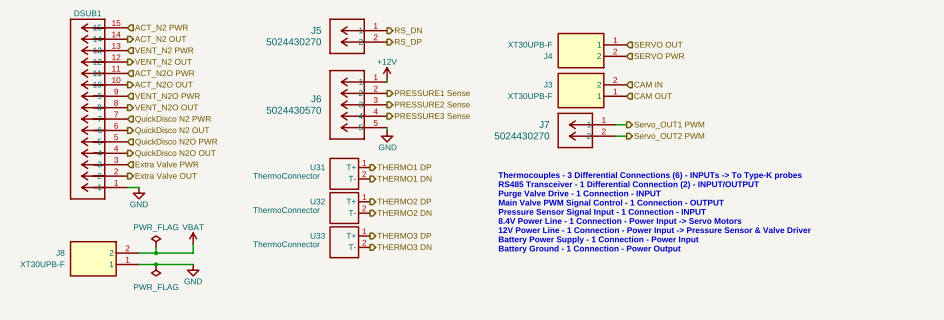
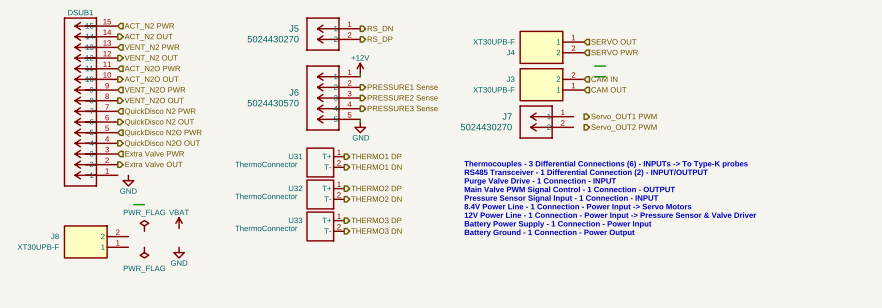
wire: (615, 124) (626, 124) -> (594, 66) (605, 66)
wire: (615, 136) (626, 136) -> (594, 76) (605, 76)
wire: (127, 187) (138, 187) -> (133, 204) (144, 204)
wire: (193, 244) (193, 253) (138, 253) -> none
wire: (156, 247) (156, 253) -> none
junction: (156, 253) -> none
wire: (138, 264) (193, 264) -> none
junction: (156, 264) -> none

